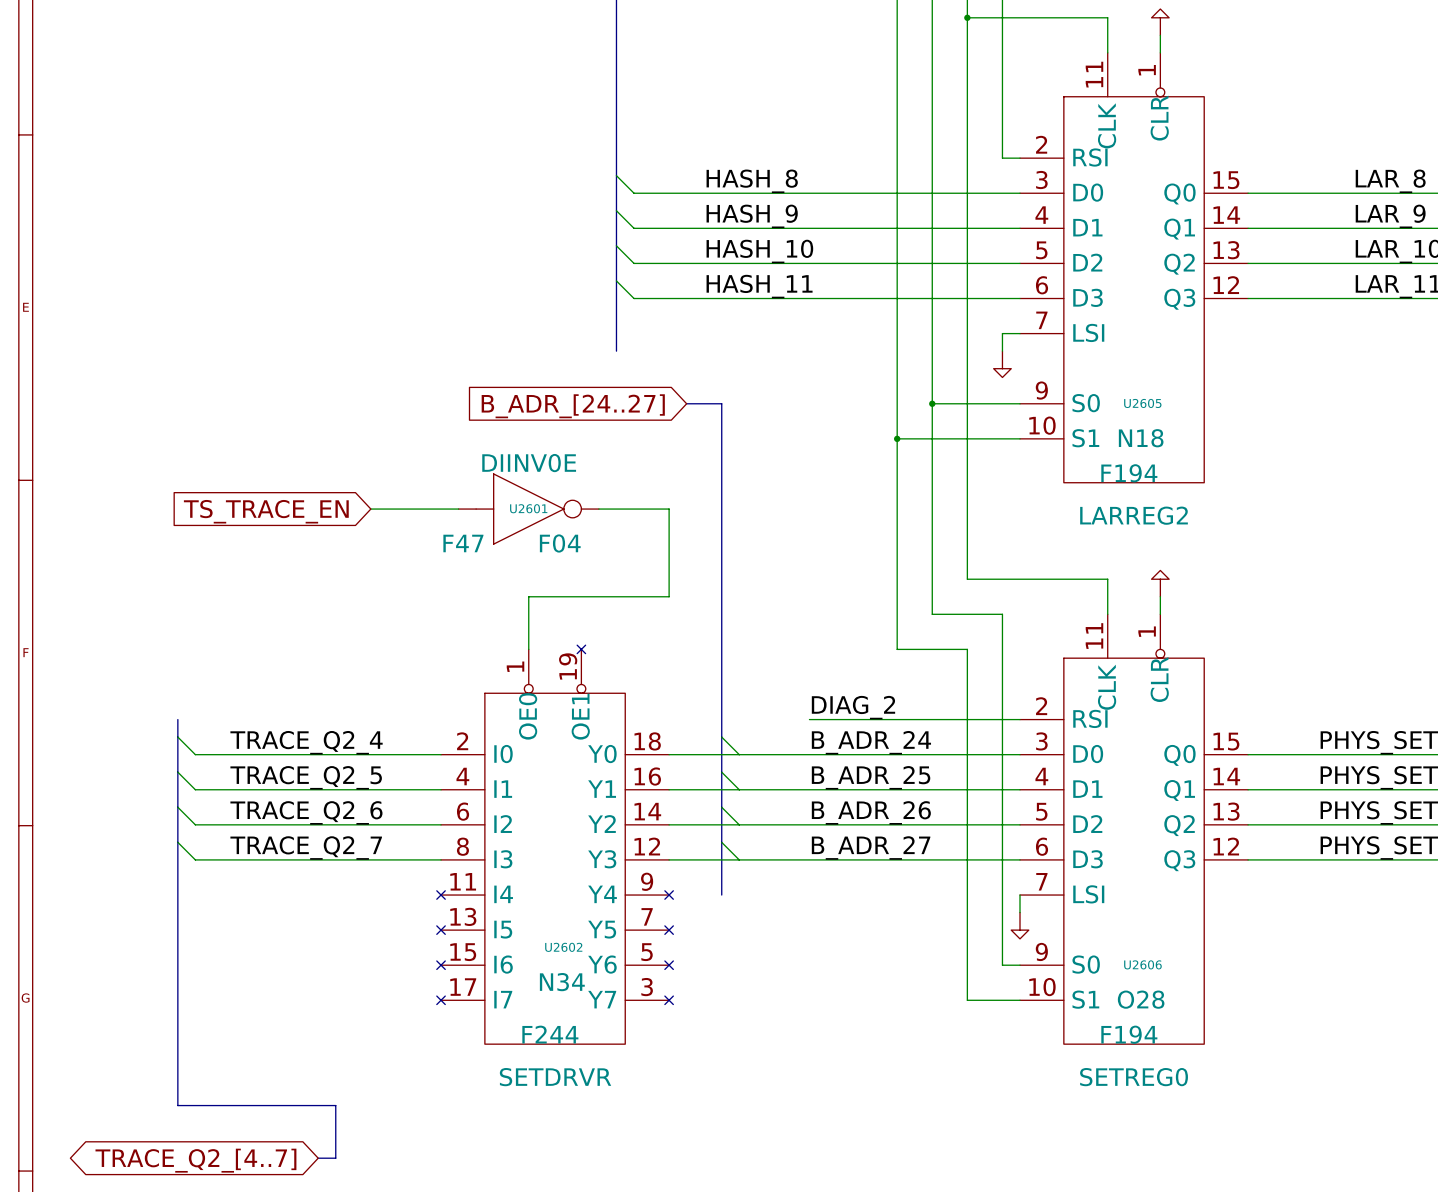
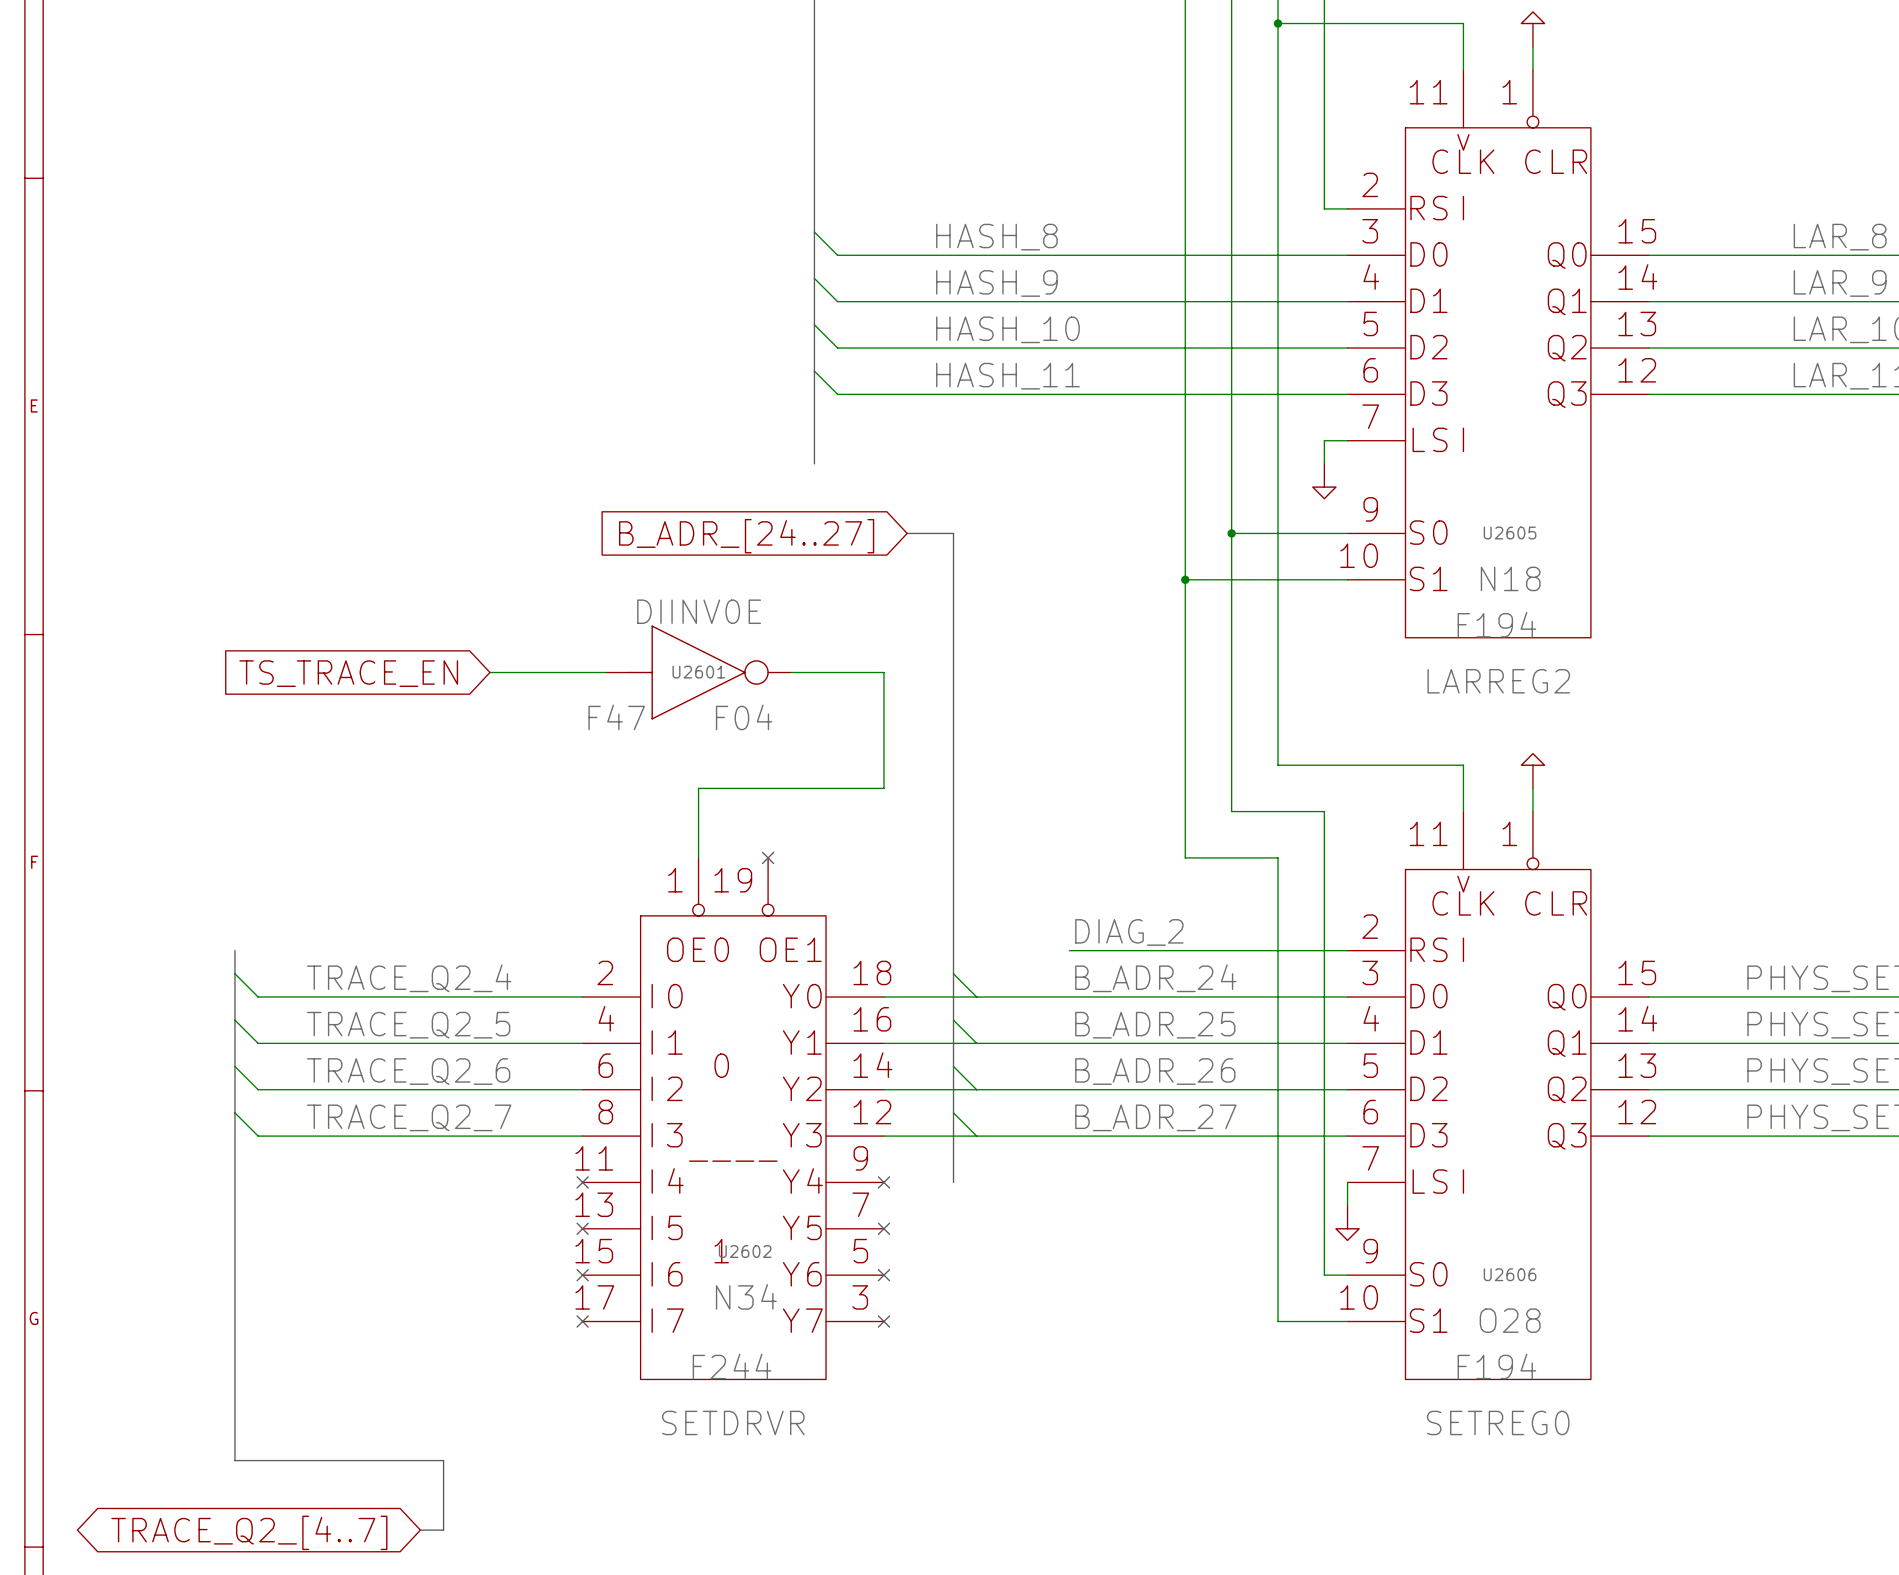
U2605 symbol: [1020, 52, 1249, 483] -> [1347, 69, 1649, 638]
U2606 symbol: [1020, 614, 1249, 1045] -> [1347, 811, 1649, 1380]
U2602 symbol: [441, 649, 670, 1045] -> [582, 857, 884, 1380]

